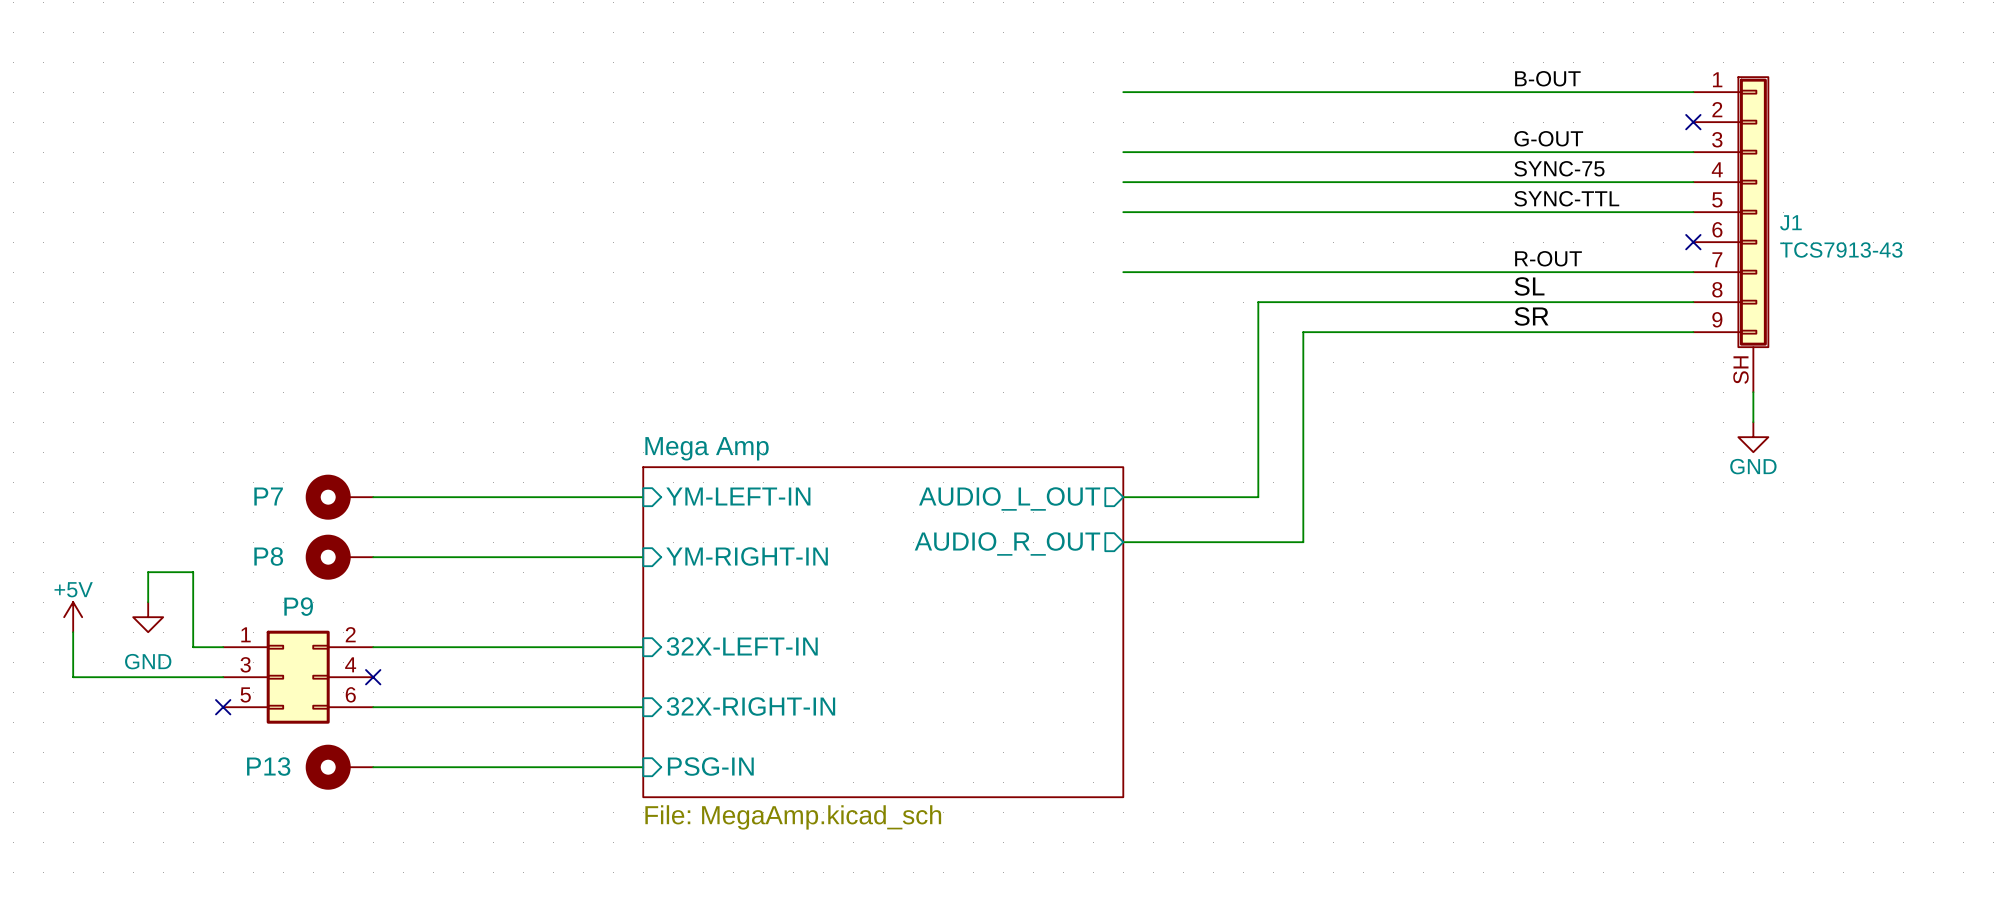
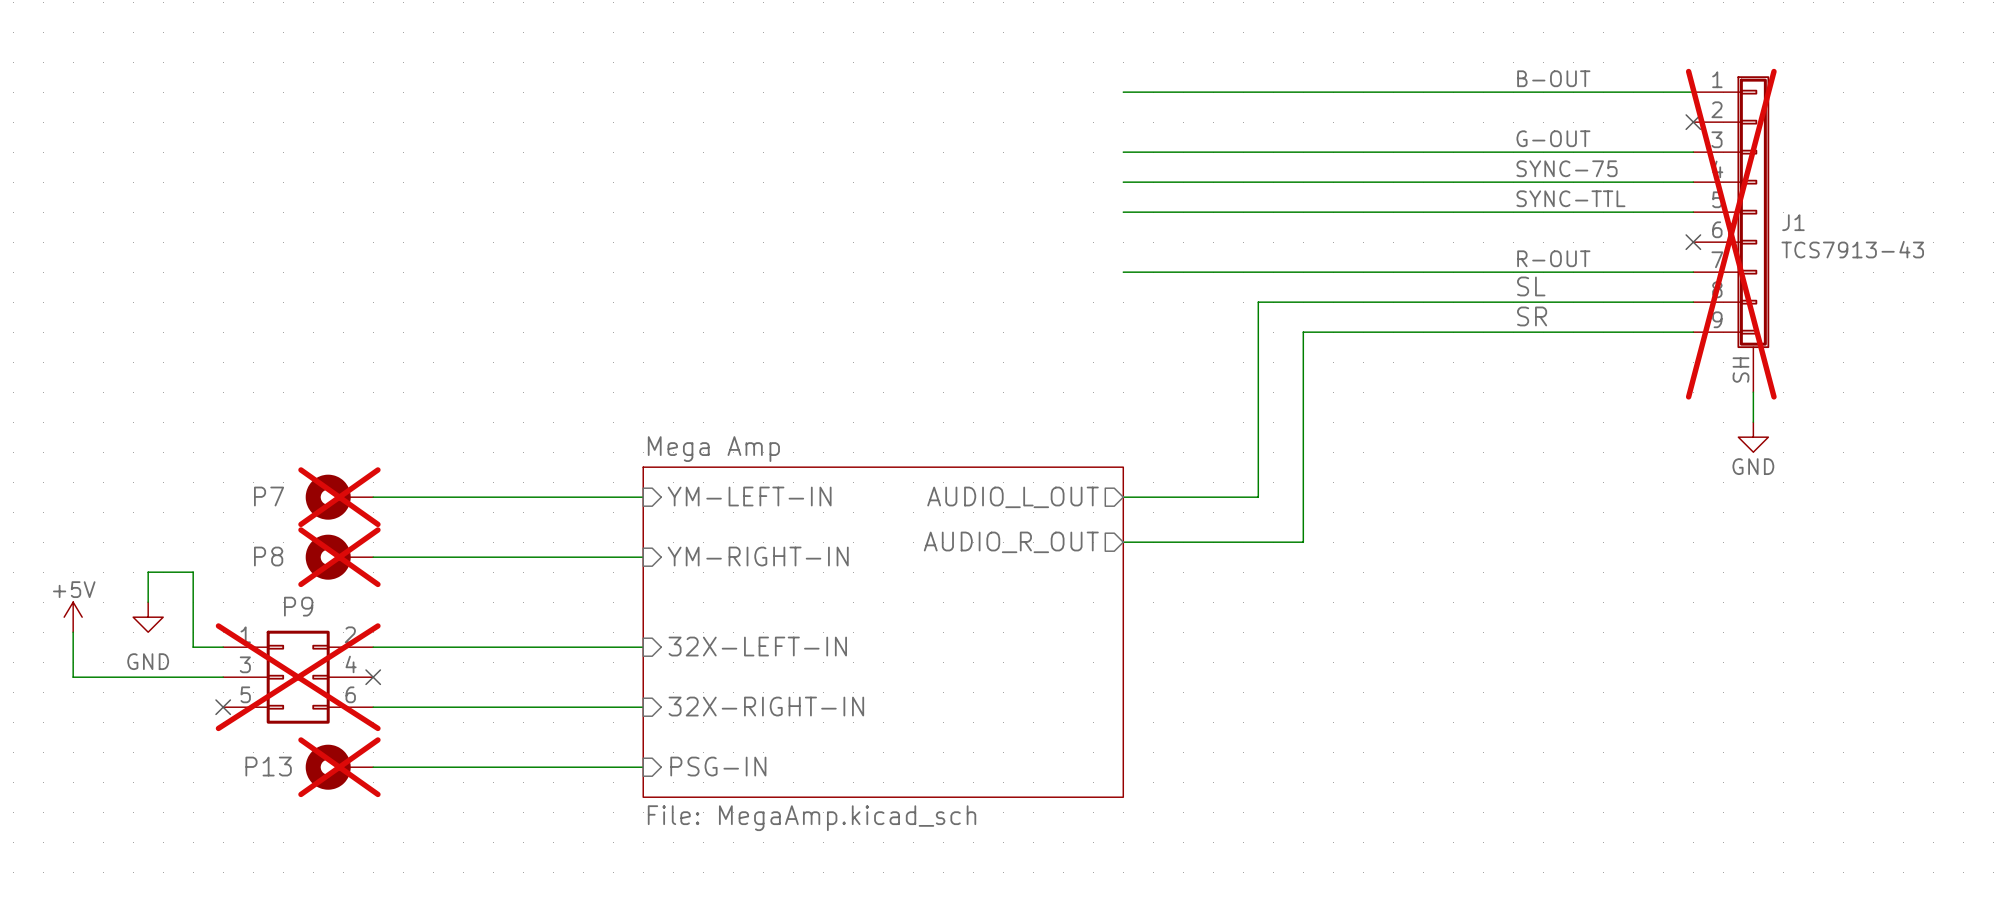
J1 do-not-place cross: none -> (1731, 234)
P7 do-not-place cross: none -> (339, 497)
P8 do-not-place cross: none -> (339, 557)
P9 do-not-place cross: none -> (298, 677)
P13 do-not-place cross: none -> (339, 767)

